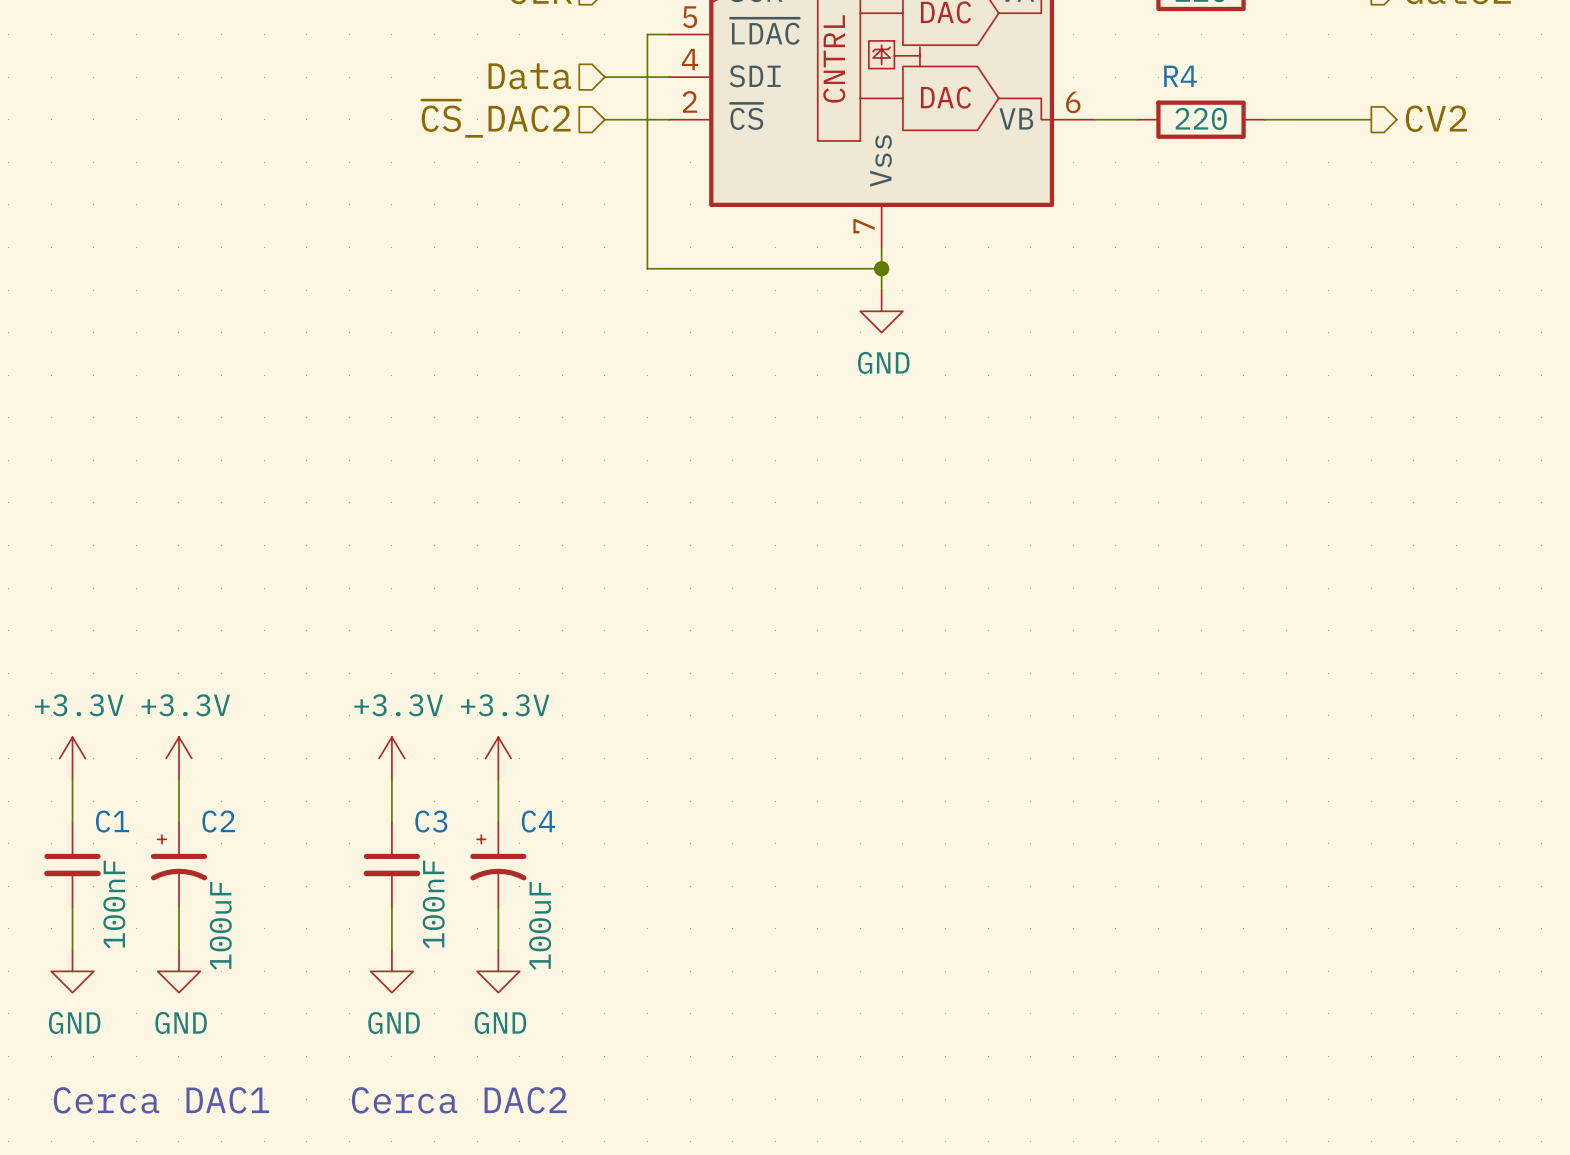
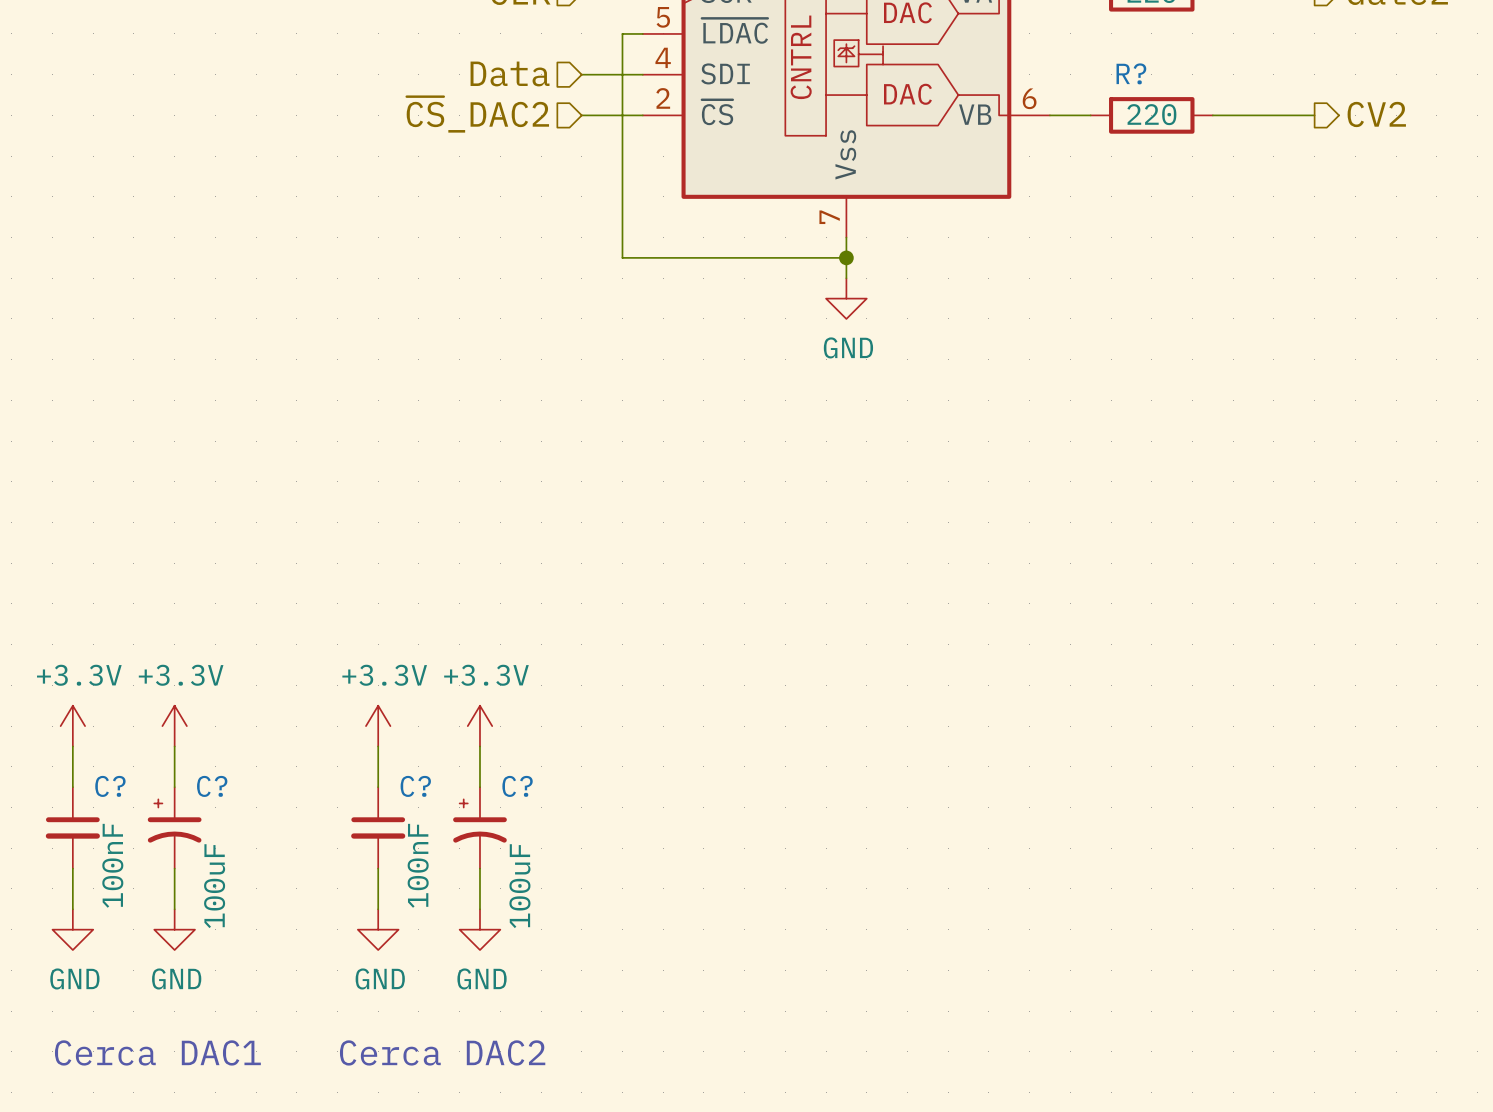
R4 name: R4 (1180, 76) -> R? (1131, 73)
C1 name: C1 (112, 821) -> C? (110, 786)
C2 name: C2 (218, 821) -> C? (212, 786)
C3 name: C3 (431, 821) -> C? (415, 786)
C4 name: C4 (538, 821) -> C? (517, 786)

